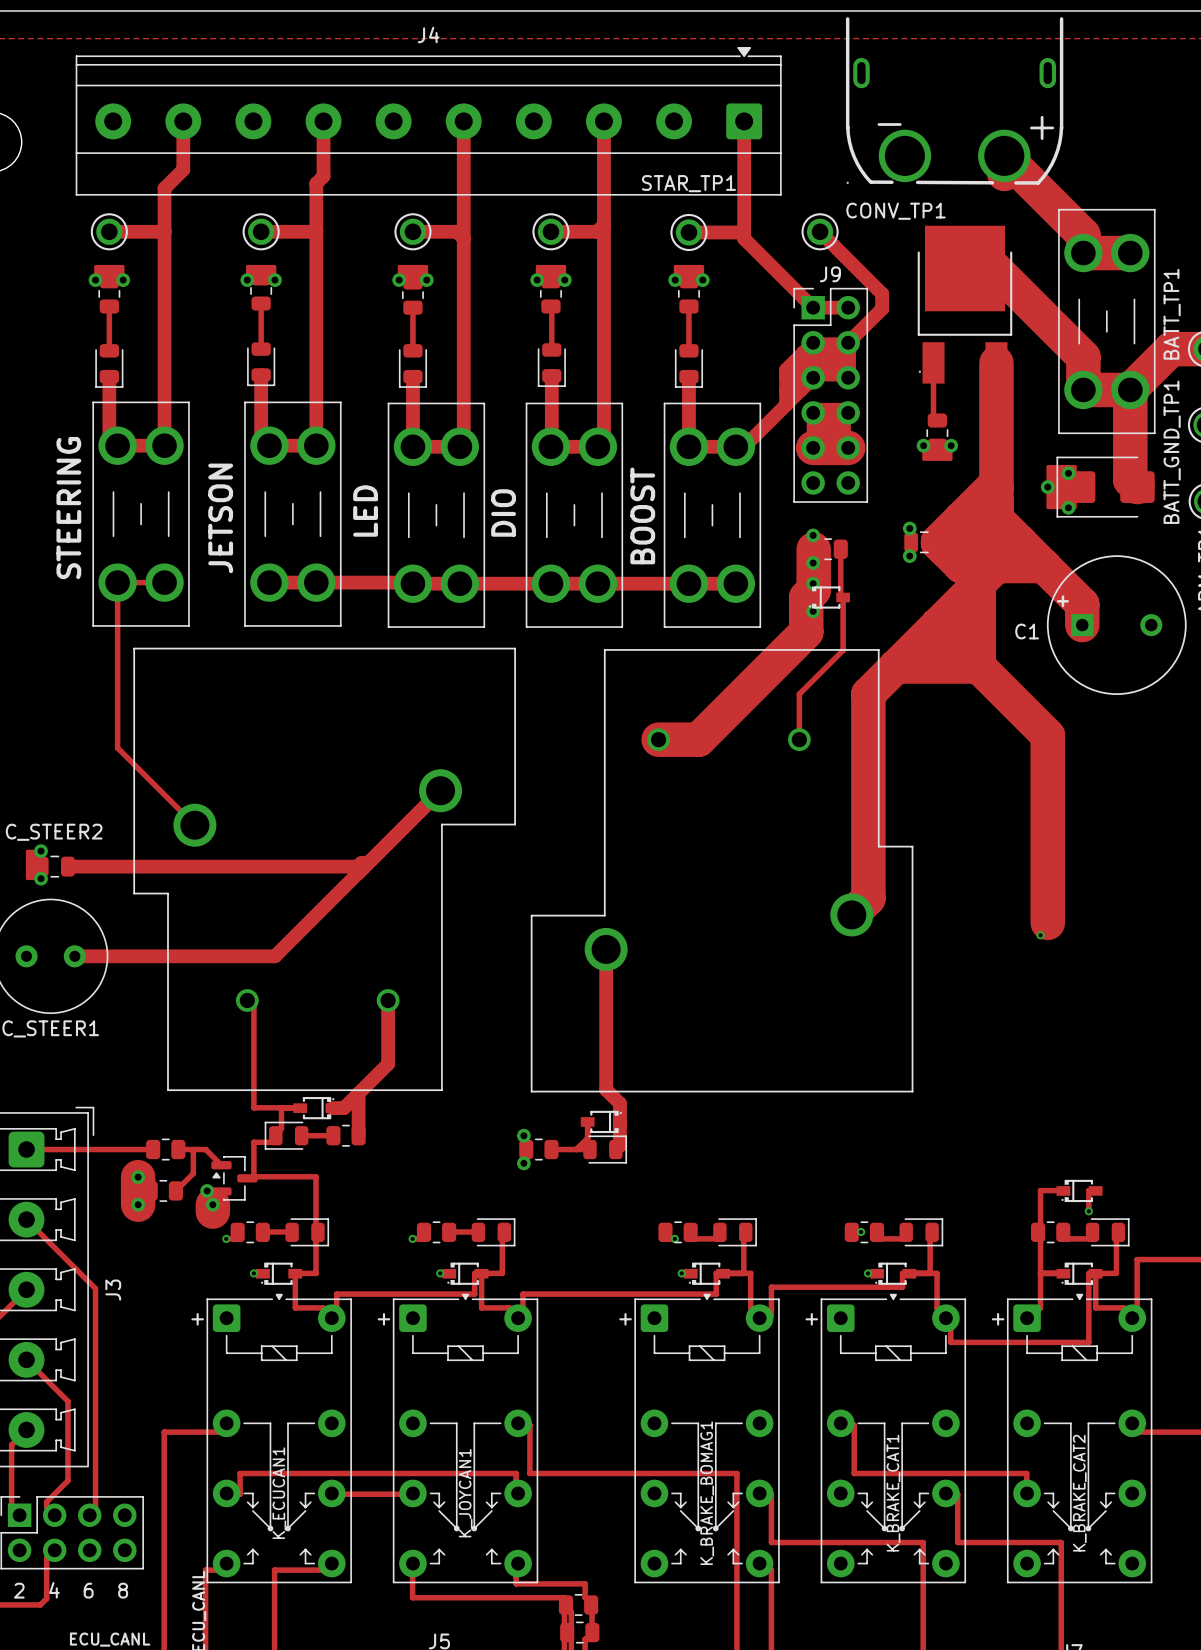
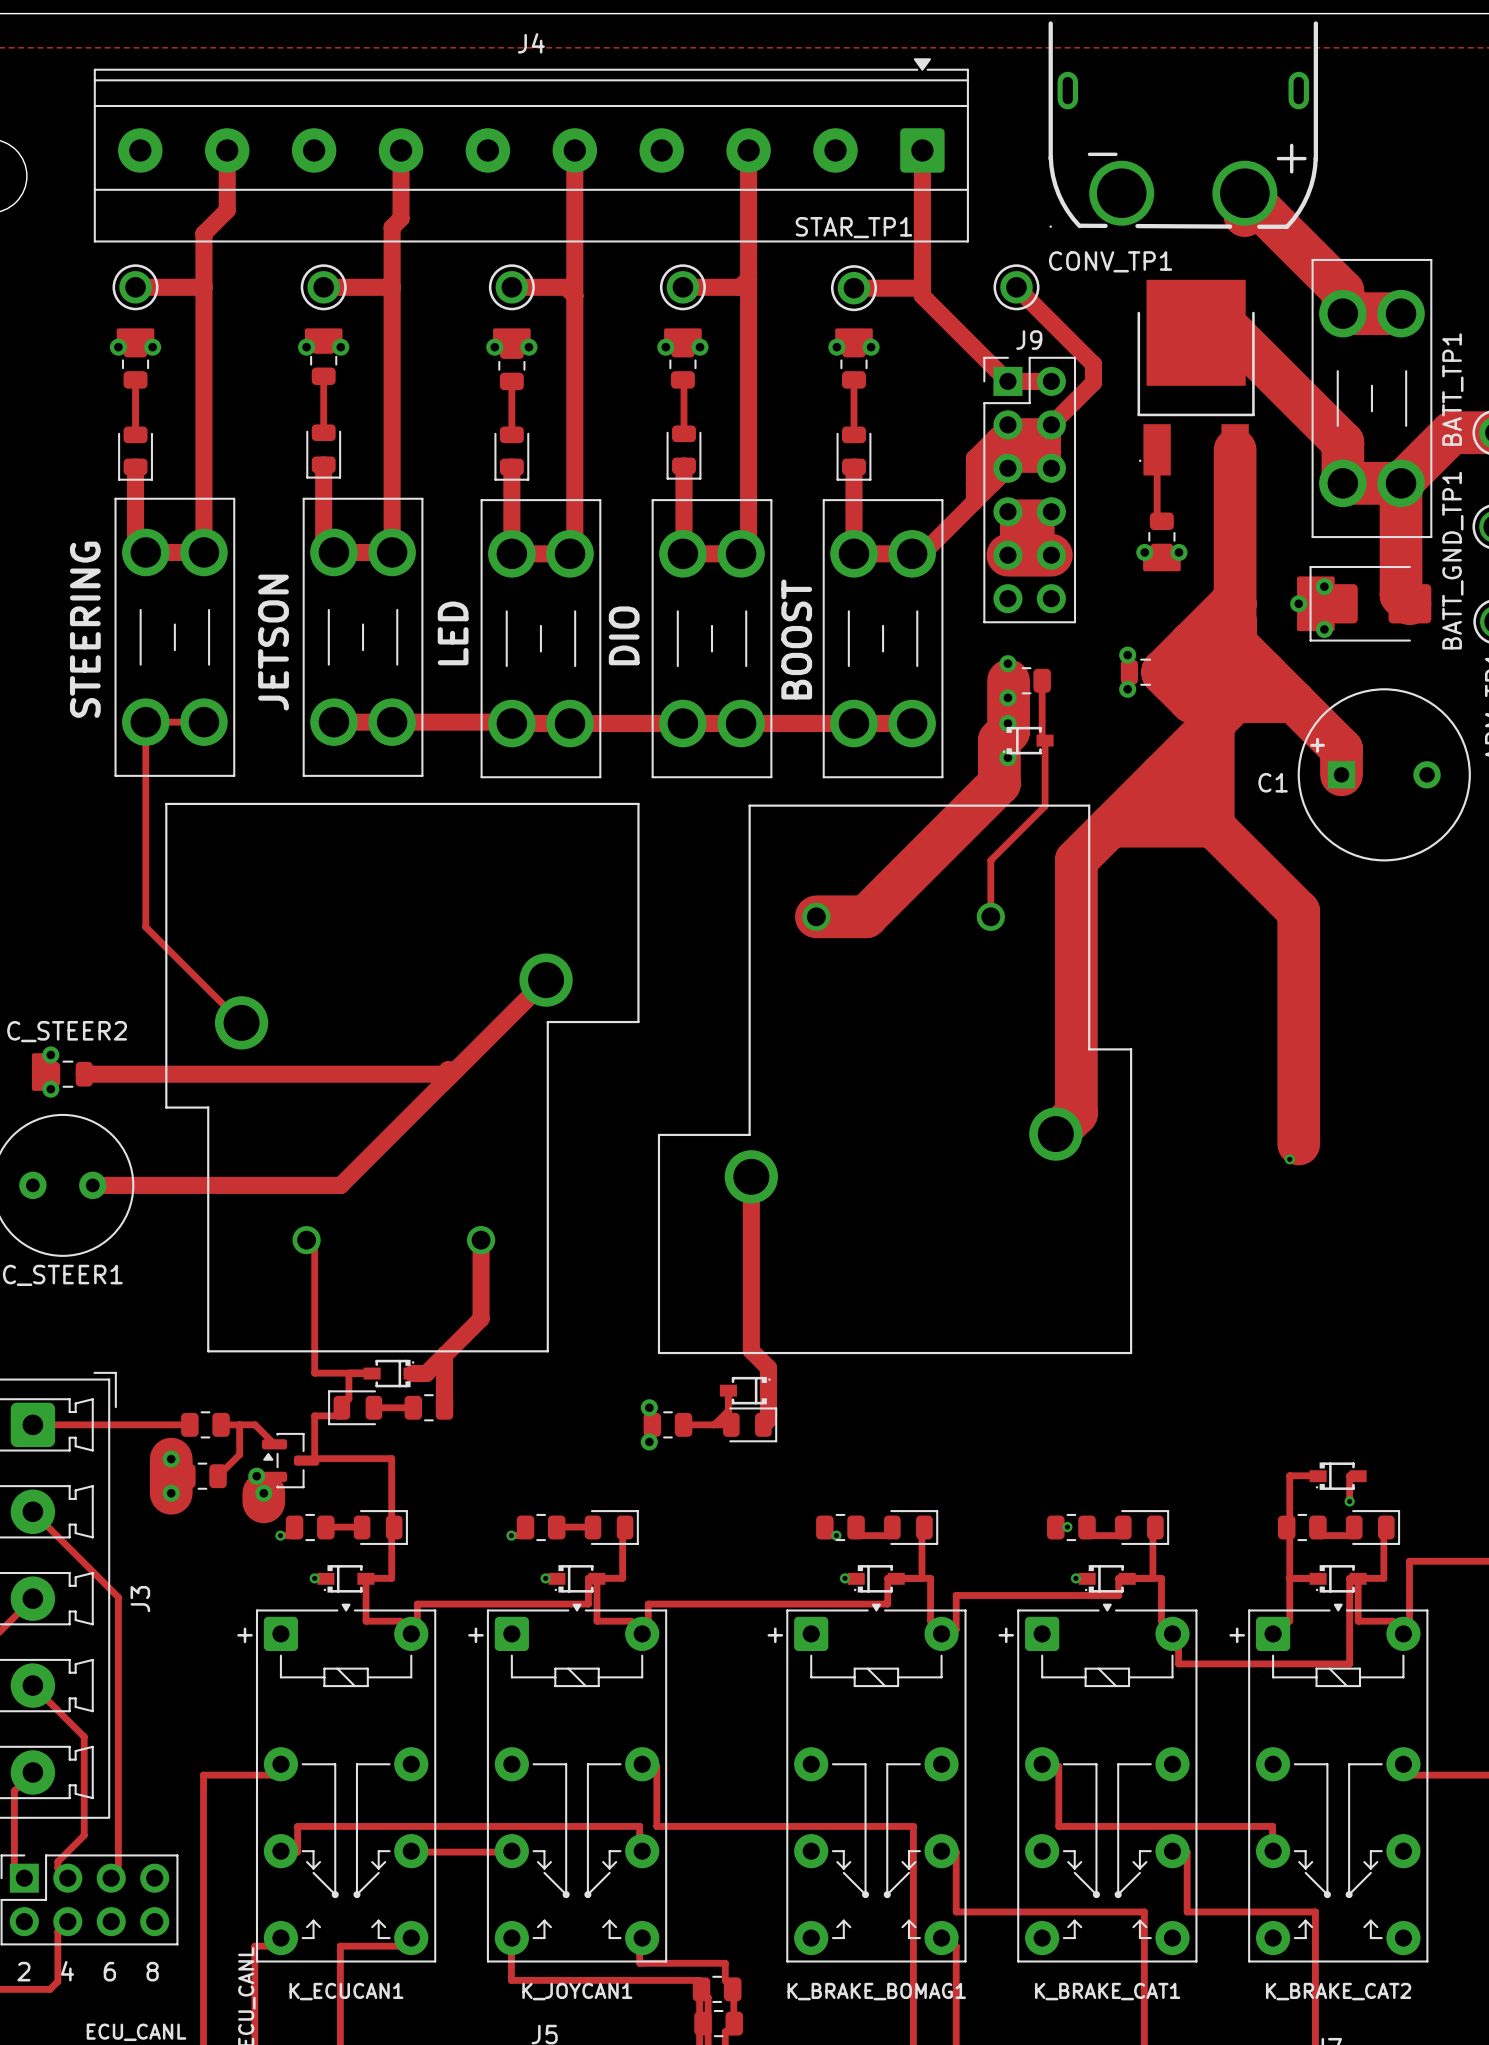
K_ECUCAN1 name rotation: 0° (279, 1493) -> 90° clockwise (346, 1991)
K_ECUCAN1 name position: K_ECUCAN1 (279, 1493) -> K_ECUCAN1 (346, 1991)
K_JOYCAN1 name rotation: 0° (465, 1493) -> 90° clockwise (577, 1991)
K_JOYCAN1 name position: K_JOYCAN1 (465, 1493) -> K_JOYCAN1 (577, 1991)
K_BRAKE_BOMAG1 name rotation: 0° (707, 1493) -> 90° clockwise (876, 1991)
K_BRAKE_CAT1 name rotation: 0° (893, 1493) -> 90° clockwise (1107, 1991)
K_BRAKE_CAT2 name rotation: 0° (1079, 1493) -> 90° clockwise (1338, 1991)

